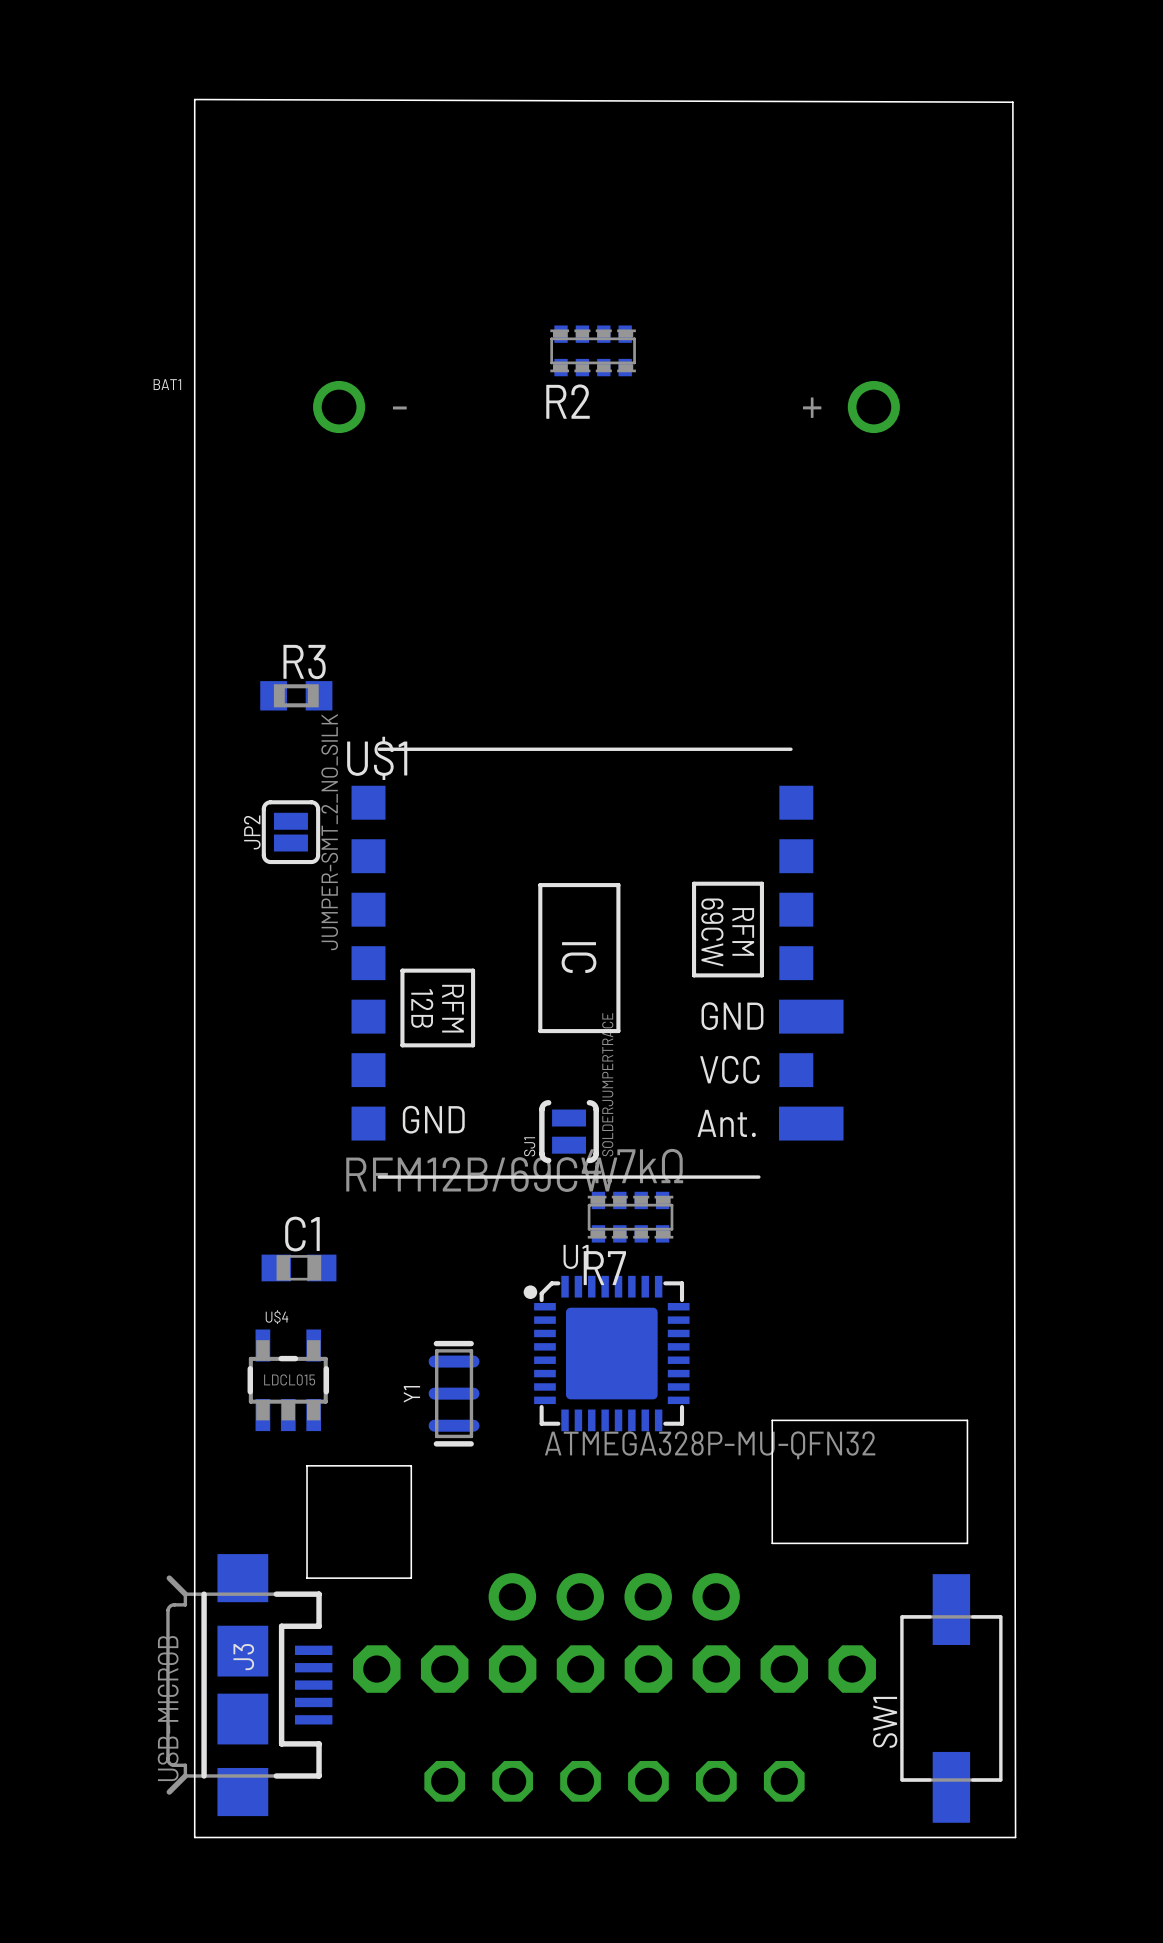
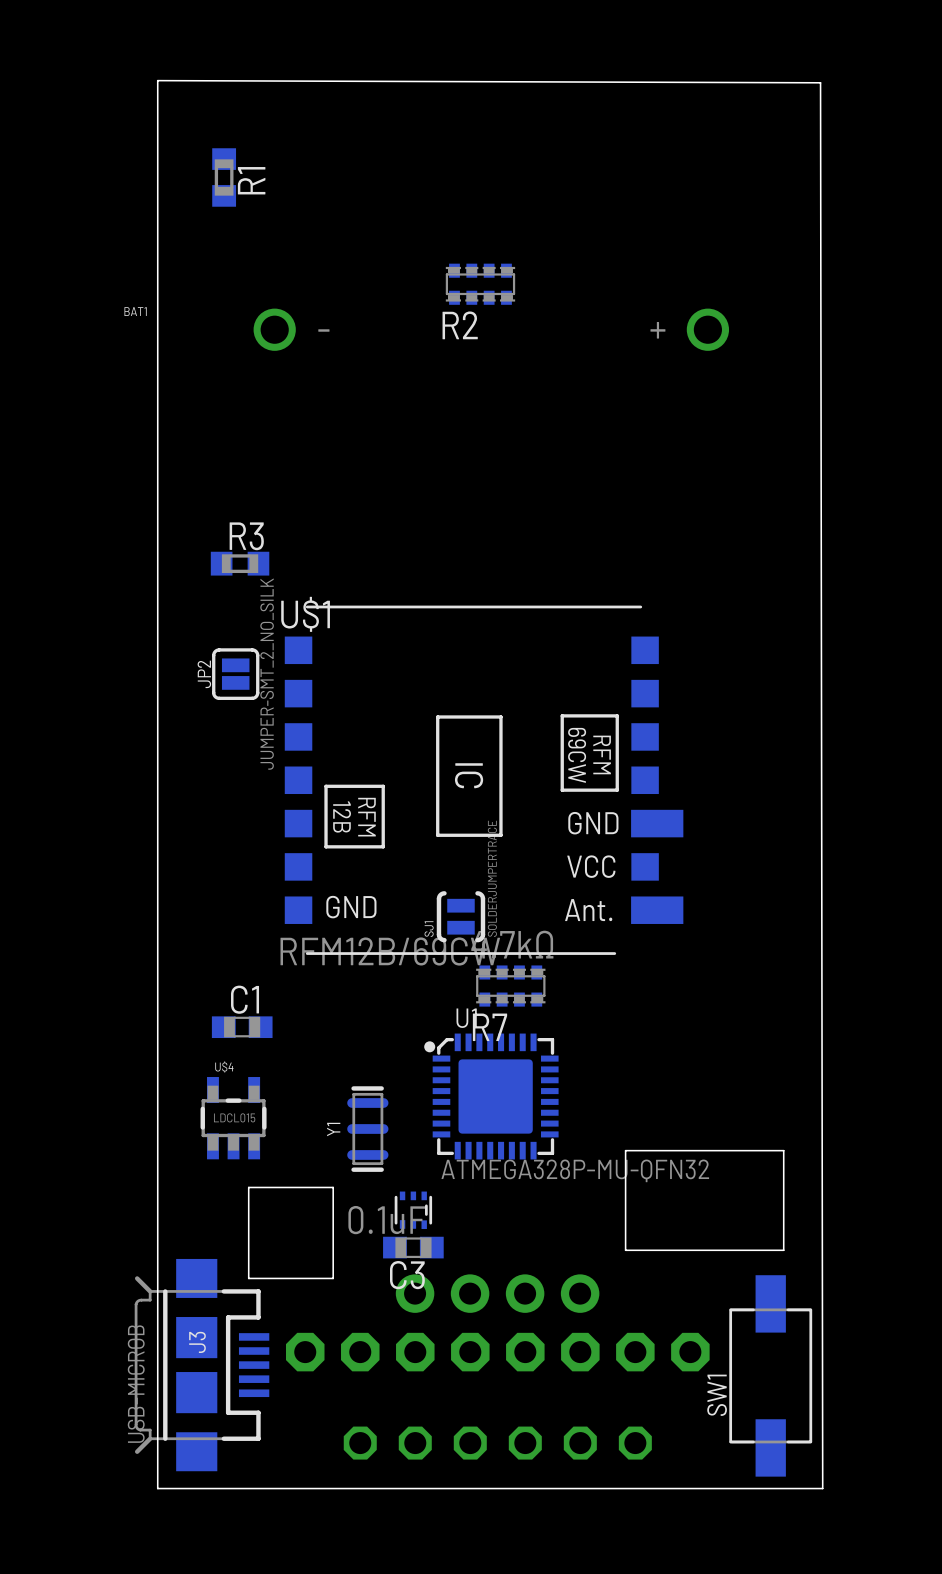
R1: none -> (224, 177)
part: none -> (413, 1210)
C3: none -> 0.1uF (413, 1247)

